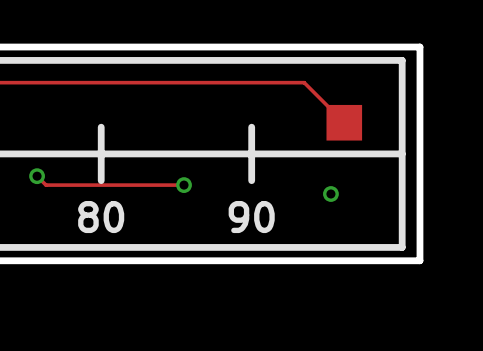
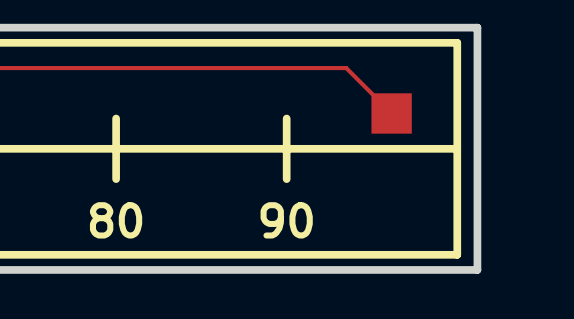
track: (37, 176) (45, 185) (184, 185) -> none
via: (37, 176) -> none
via: (184, 185) -> none
via: (330, 194) -> none

